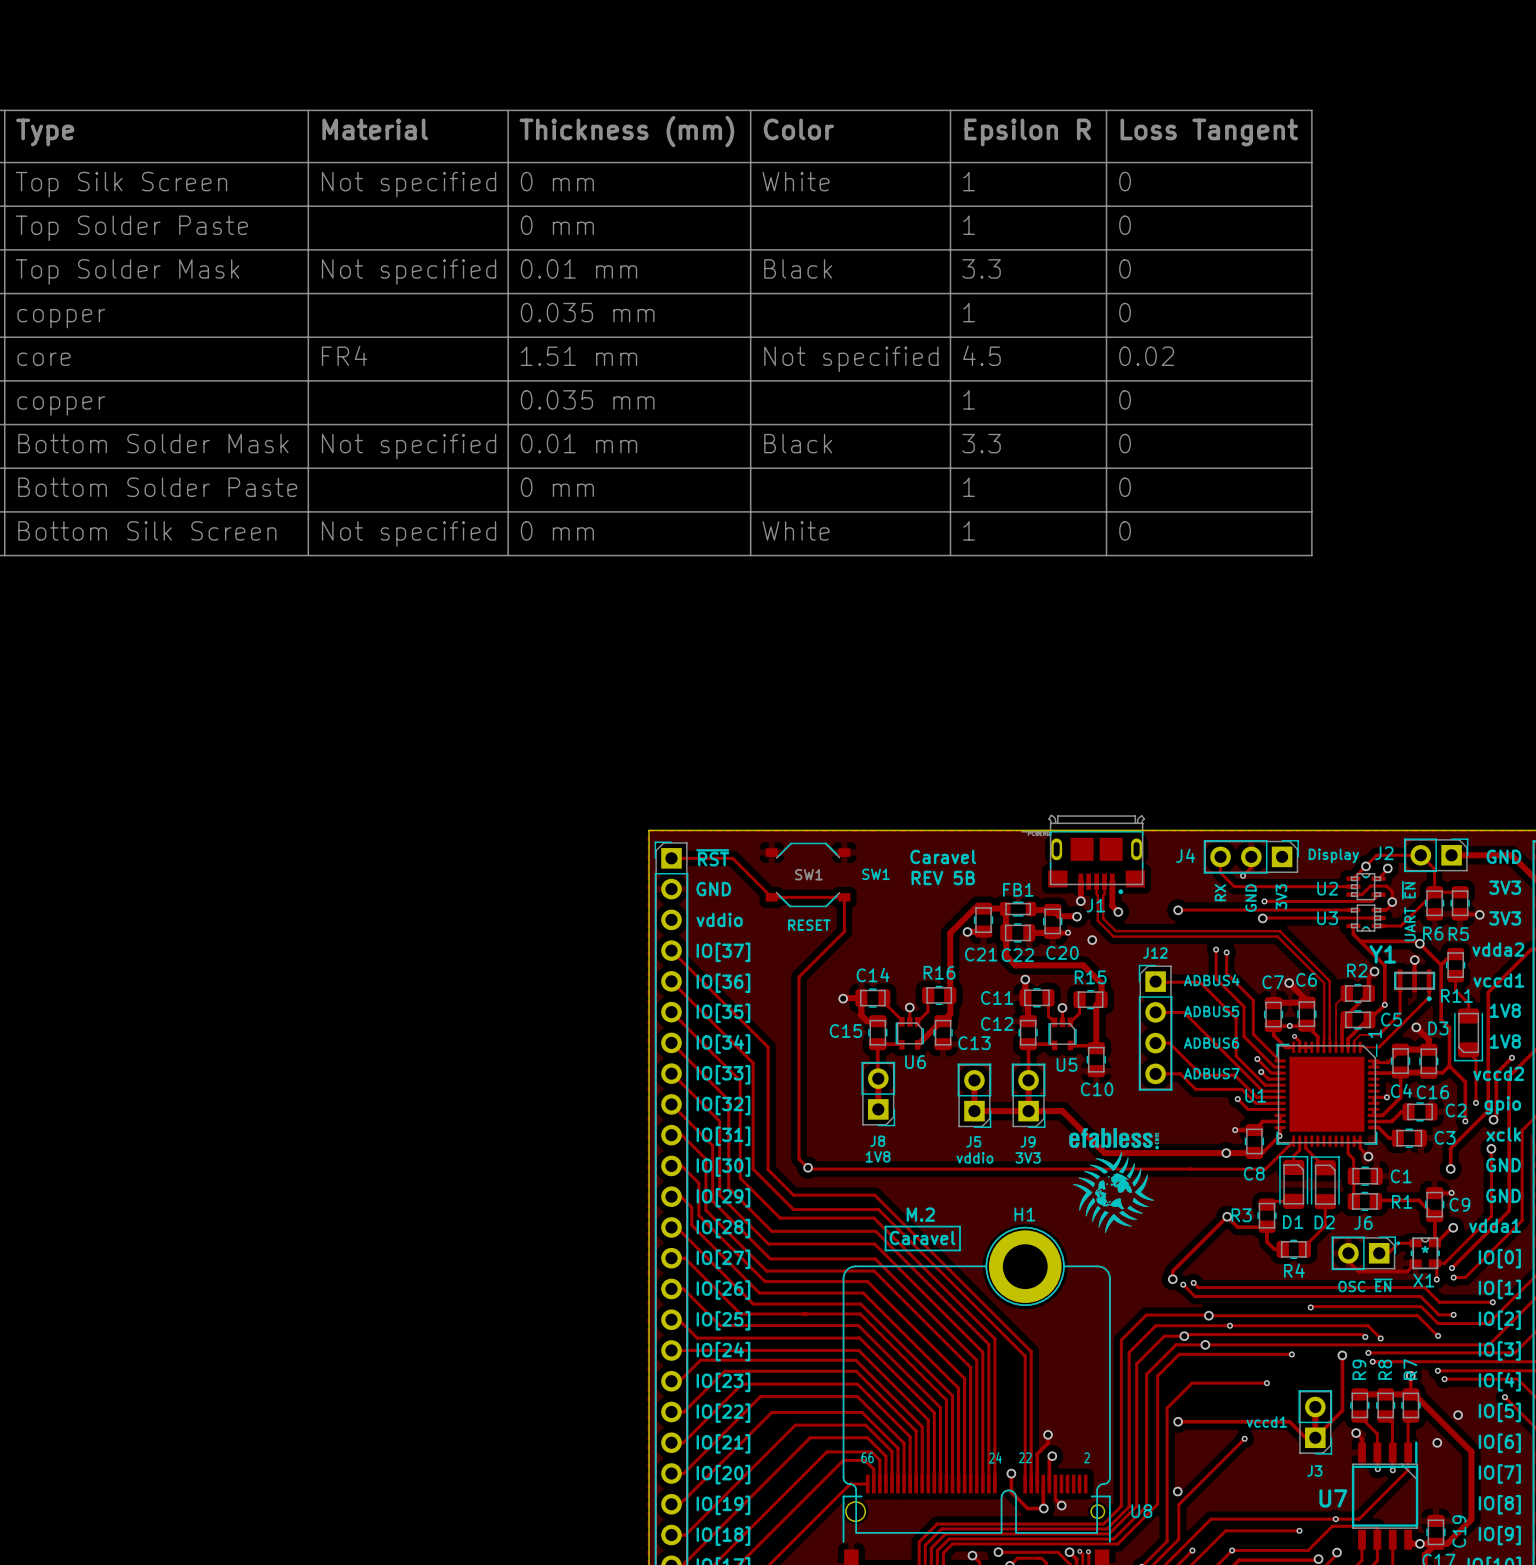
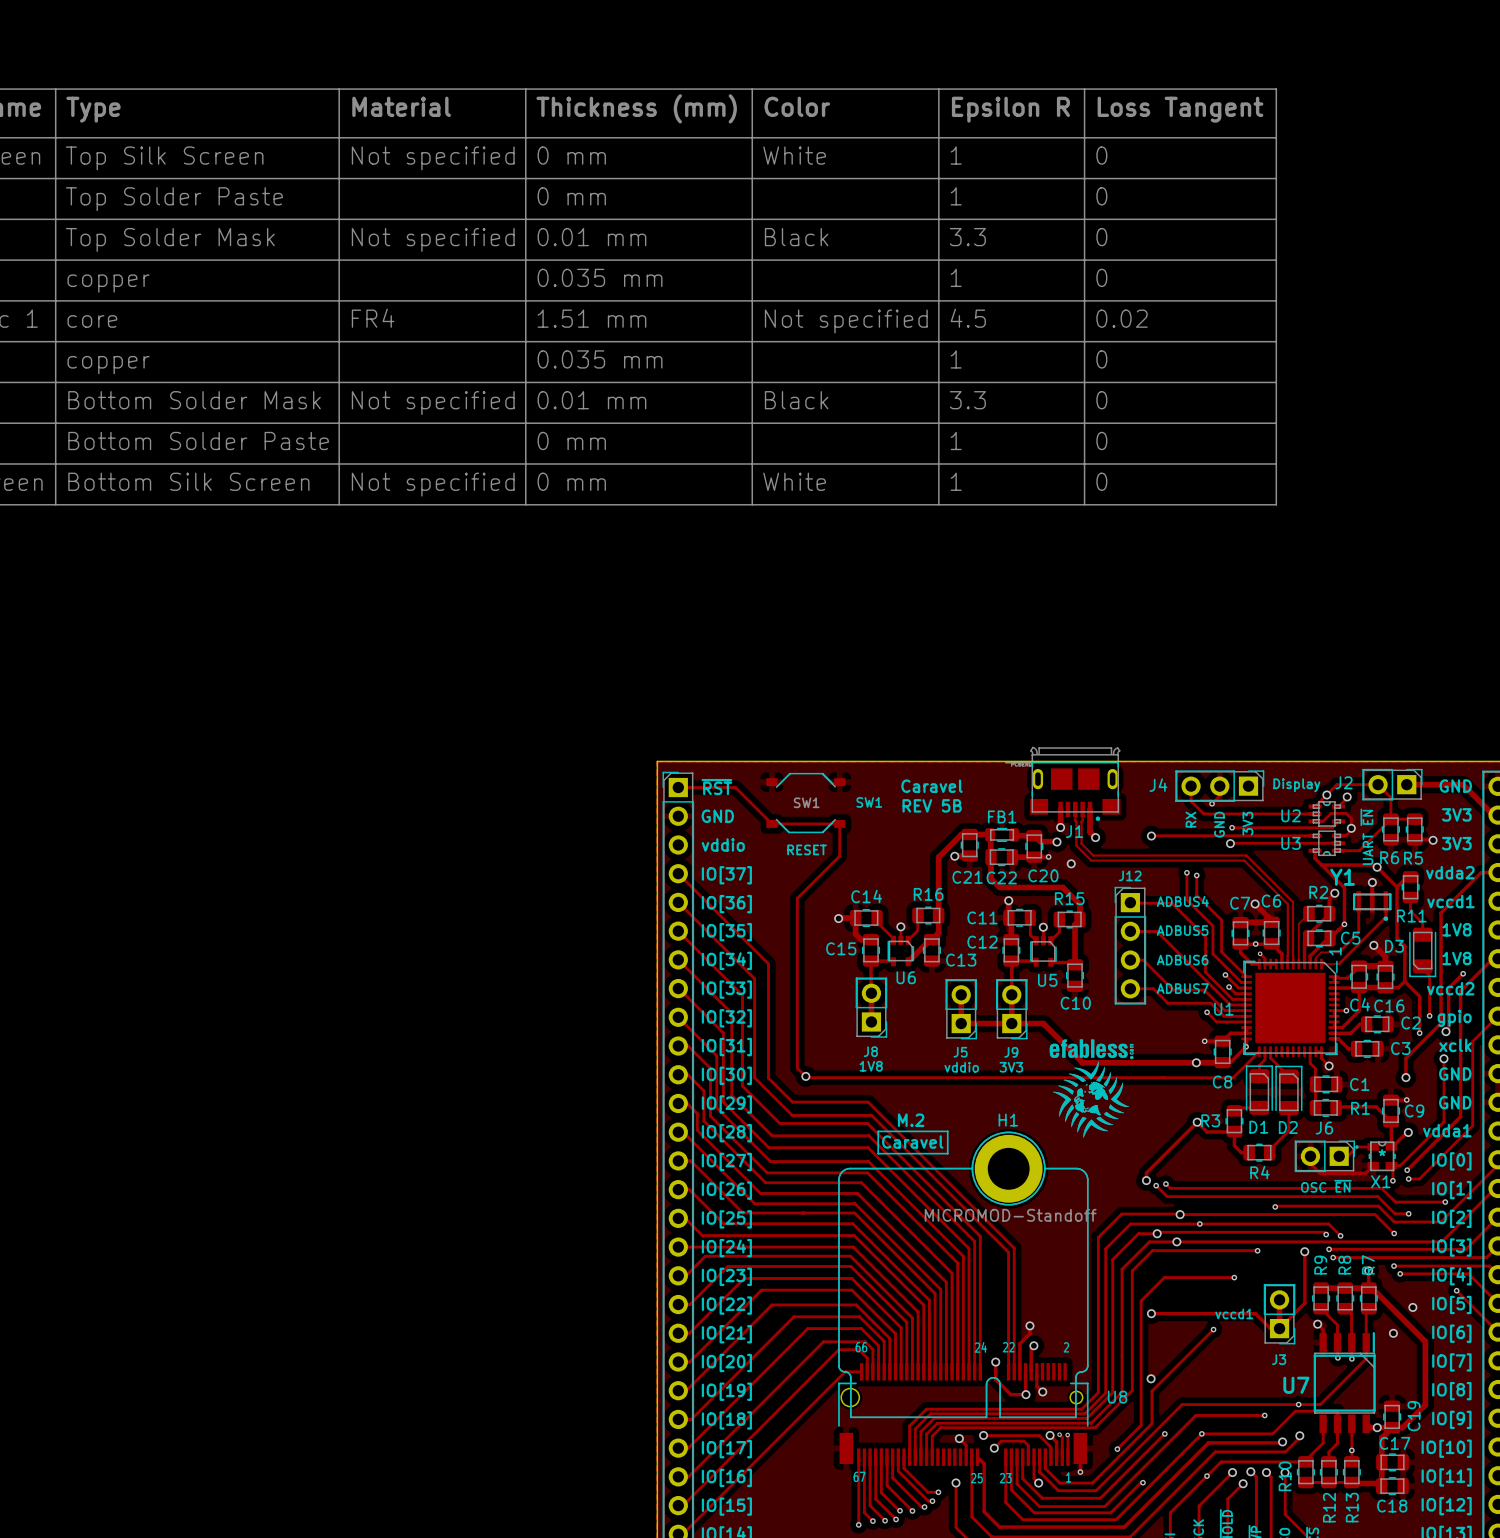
H1 value: none -> MICROMOD-Standoff (1010, 1215)

